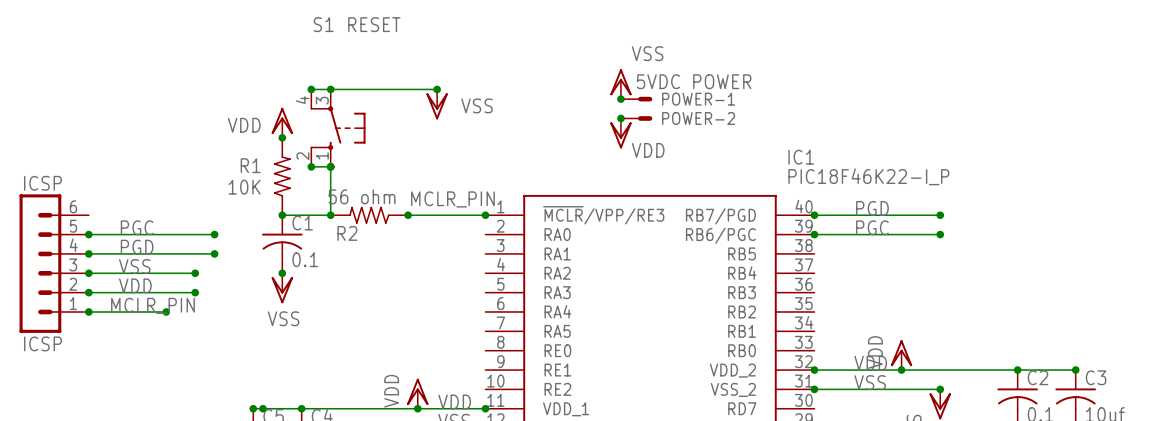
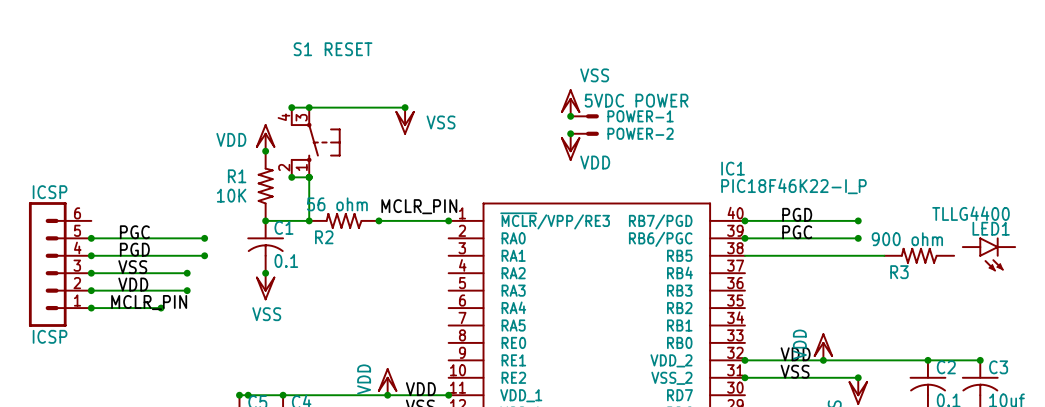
LED1: none -> TLLG4400 (988, 254)
wire: none -> (744, 255) (884, 255)
R3: none -> 900 ohm (919, 255)

